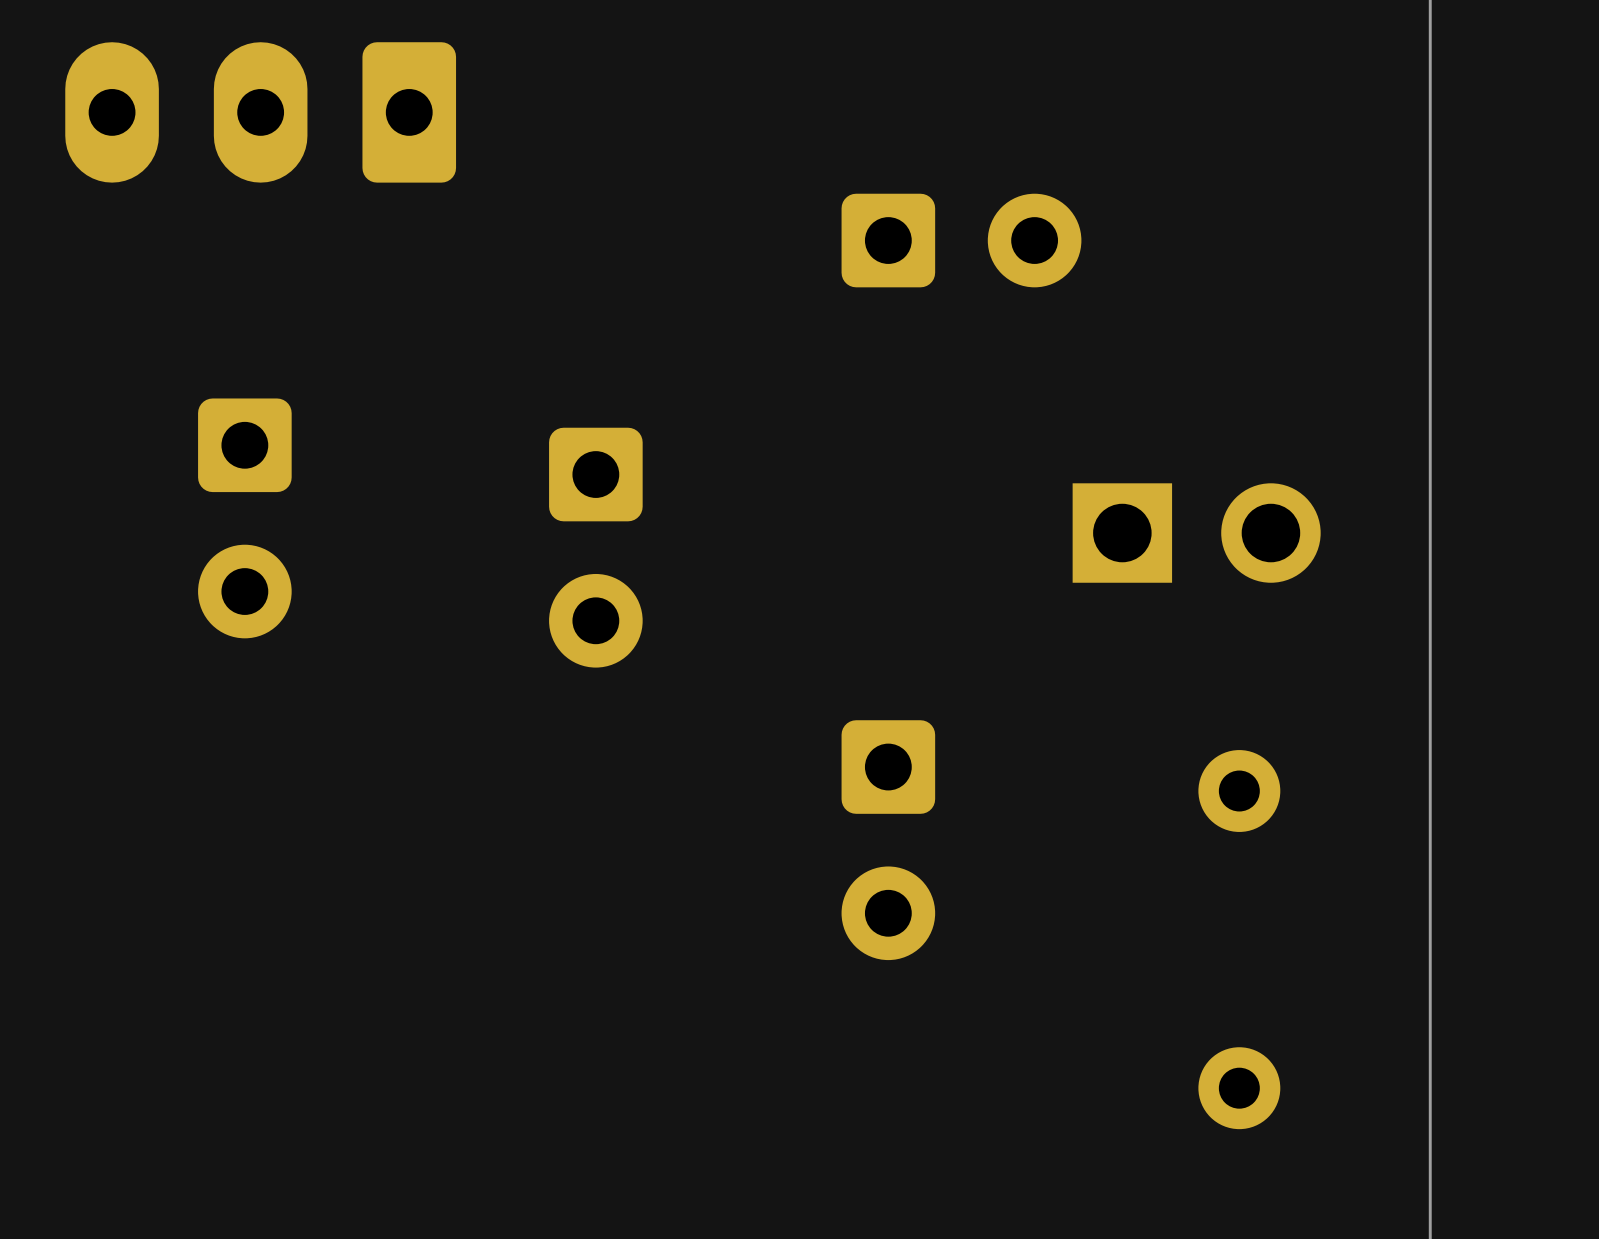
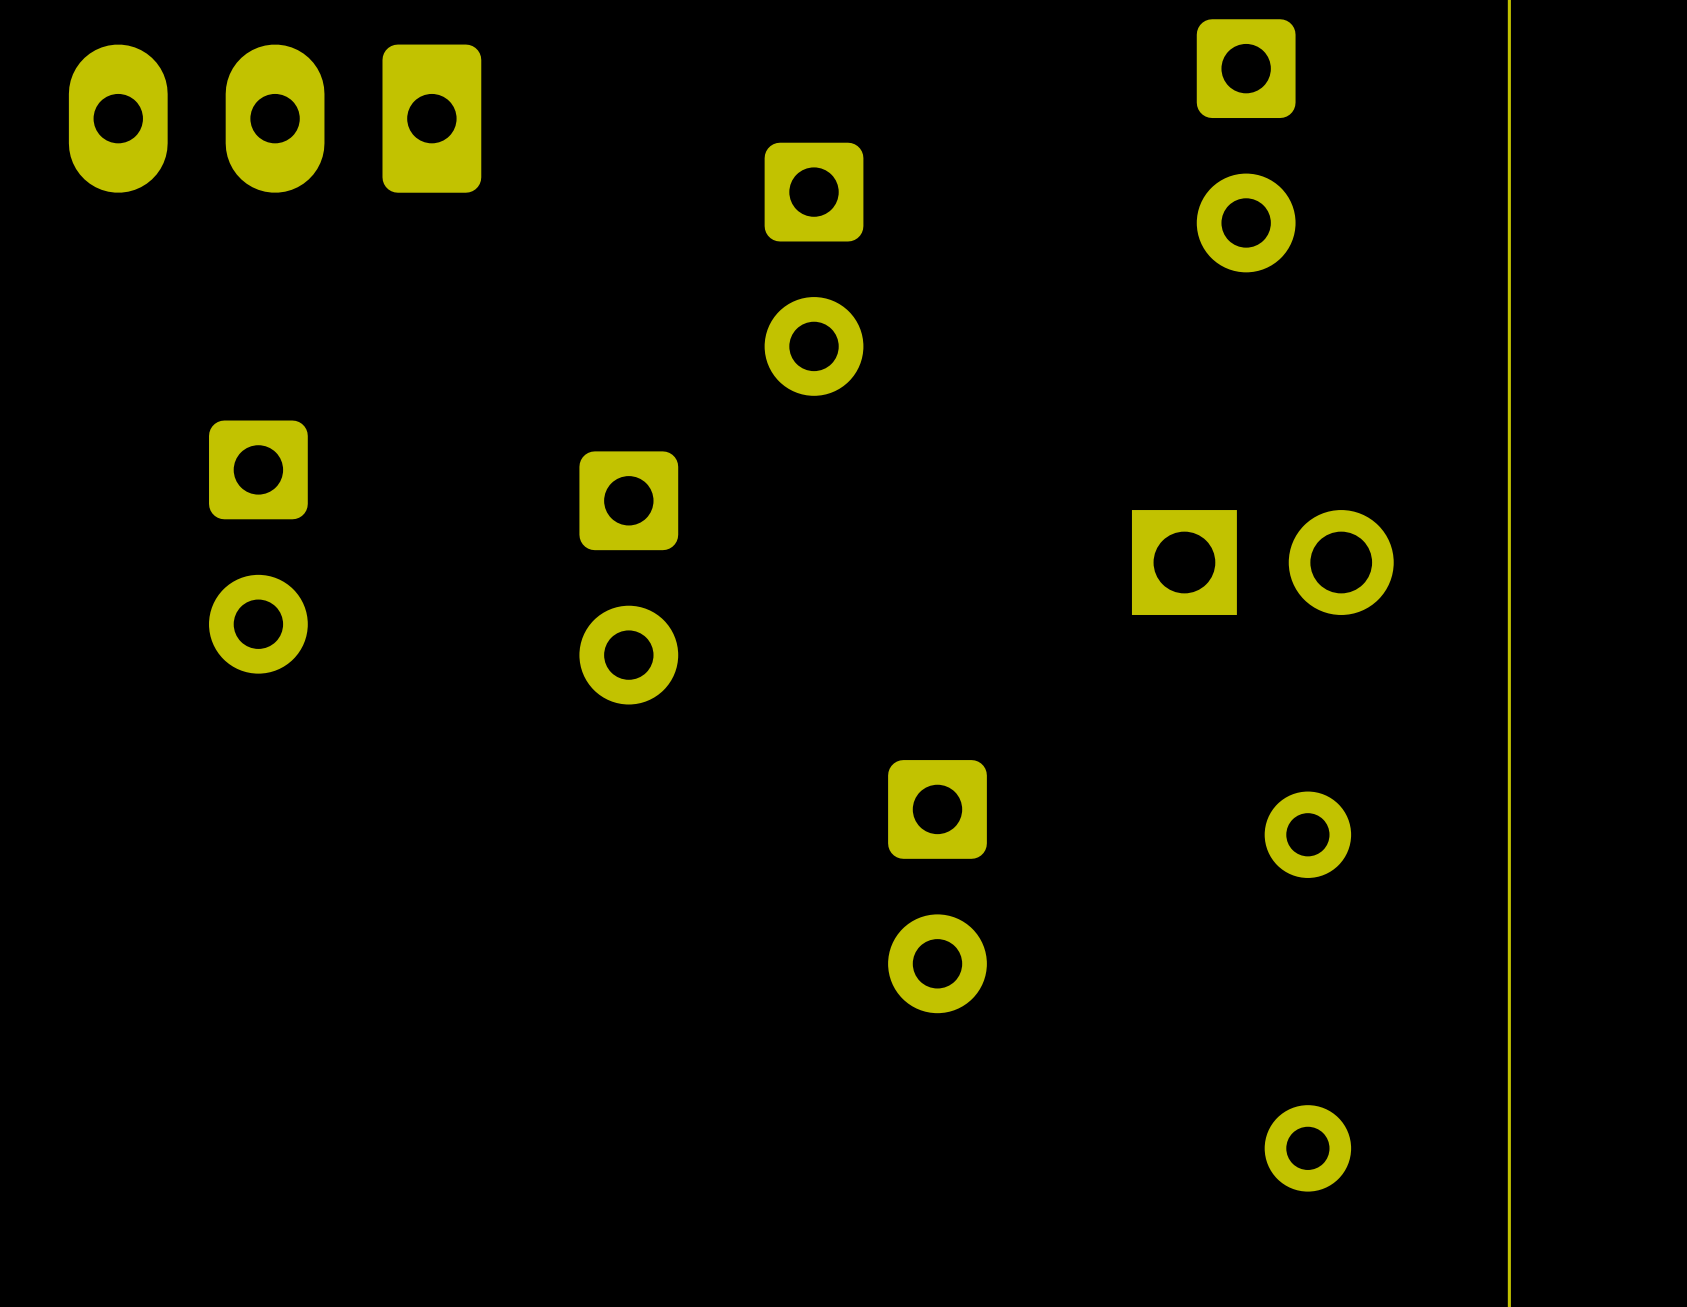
part: none -> (1246, 145)
part: (961, 240) -> none
part: none -> (814, 269)

